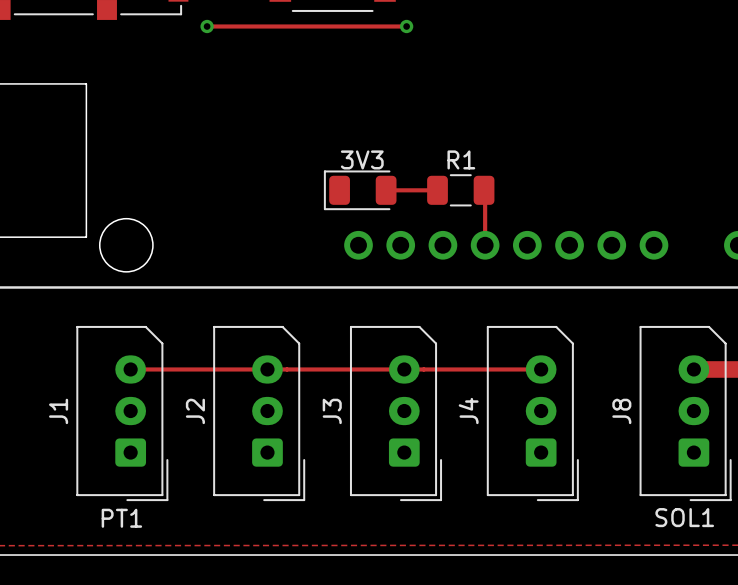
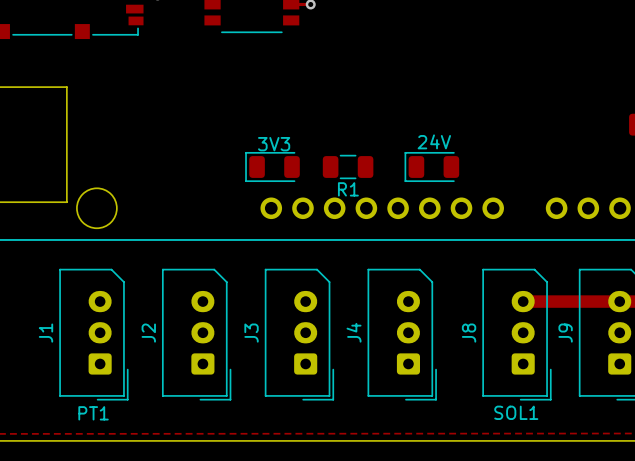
track: (207, 26) (406, 26) -> none
via: (207, 26) -> none
via: (406, 26) -> none
R1 name position: R1 (461, 159) -> R1 (348, 189)
track: (386, 190) (437, 190) -> none
track: (484, 190) (485, 245) -> none
part: none -> 24V (431, 166)
track: (130, 369) (541, 369) -> none

